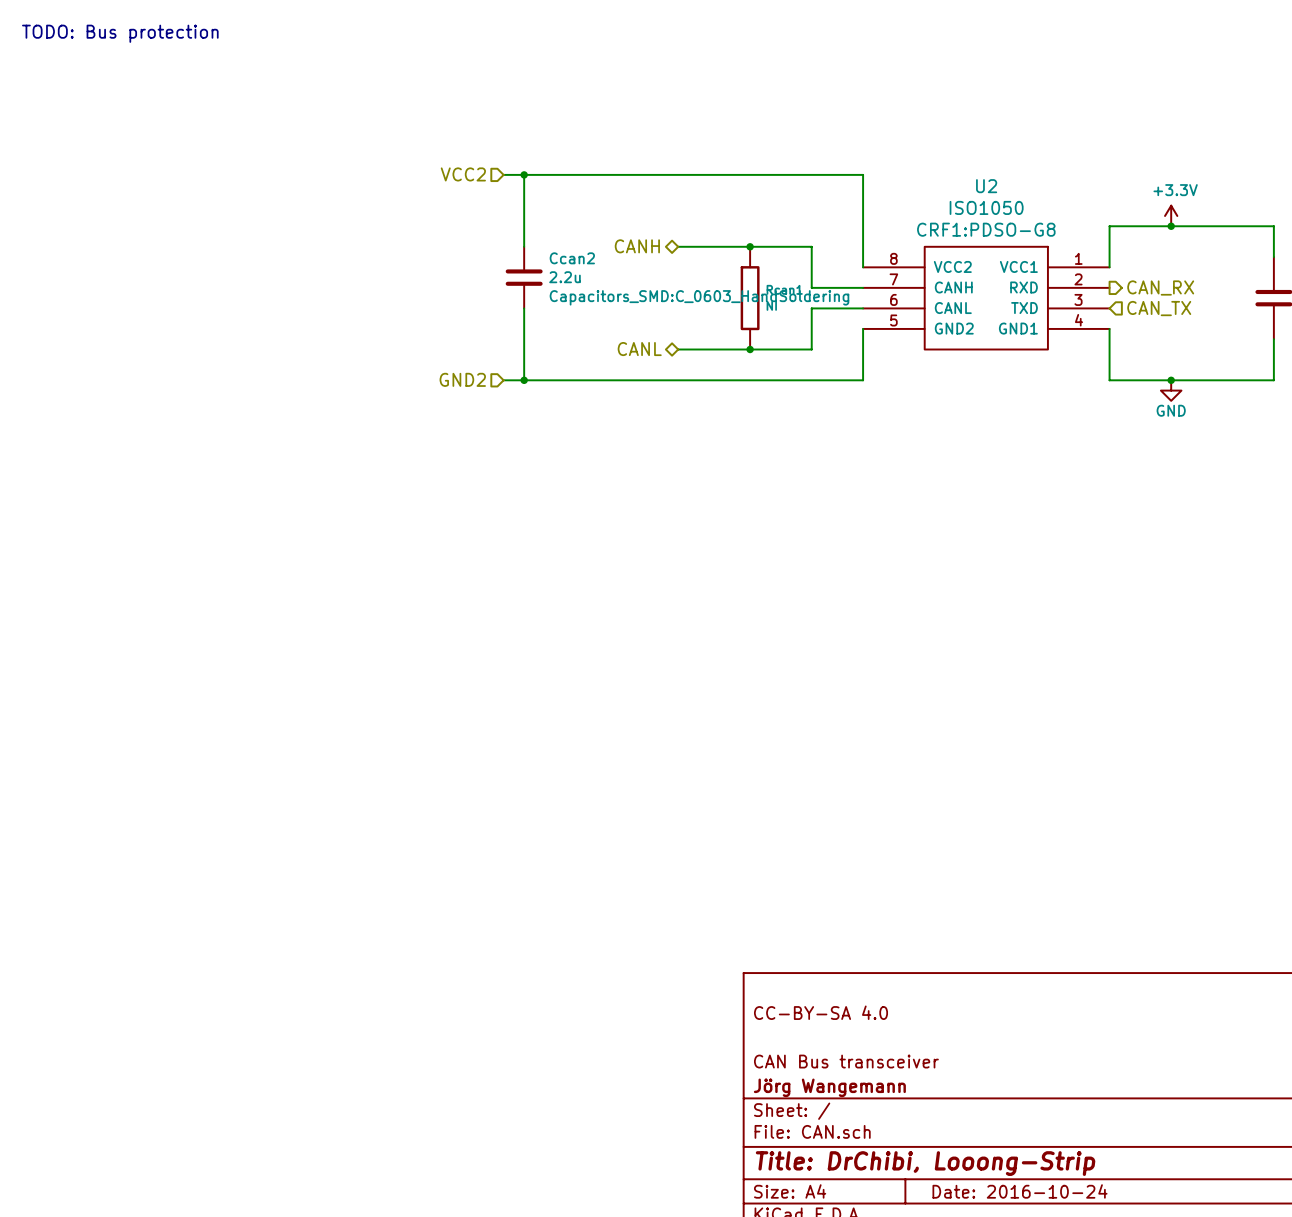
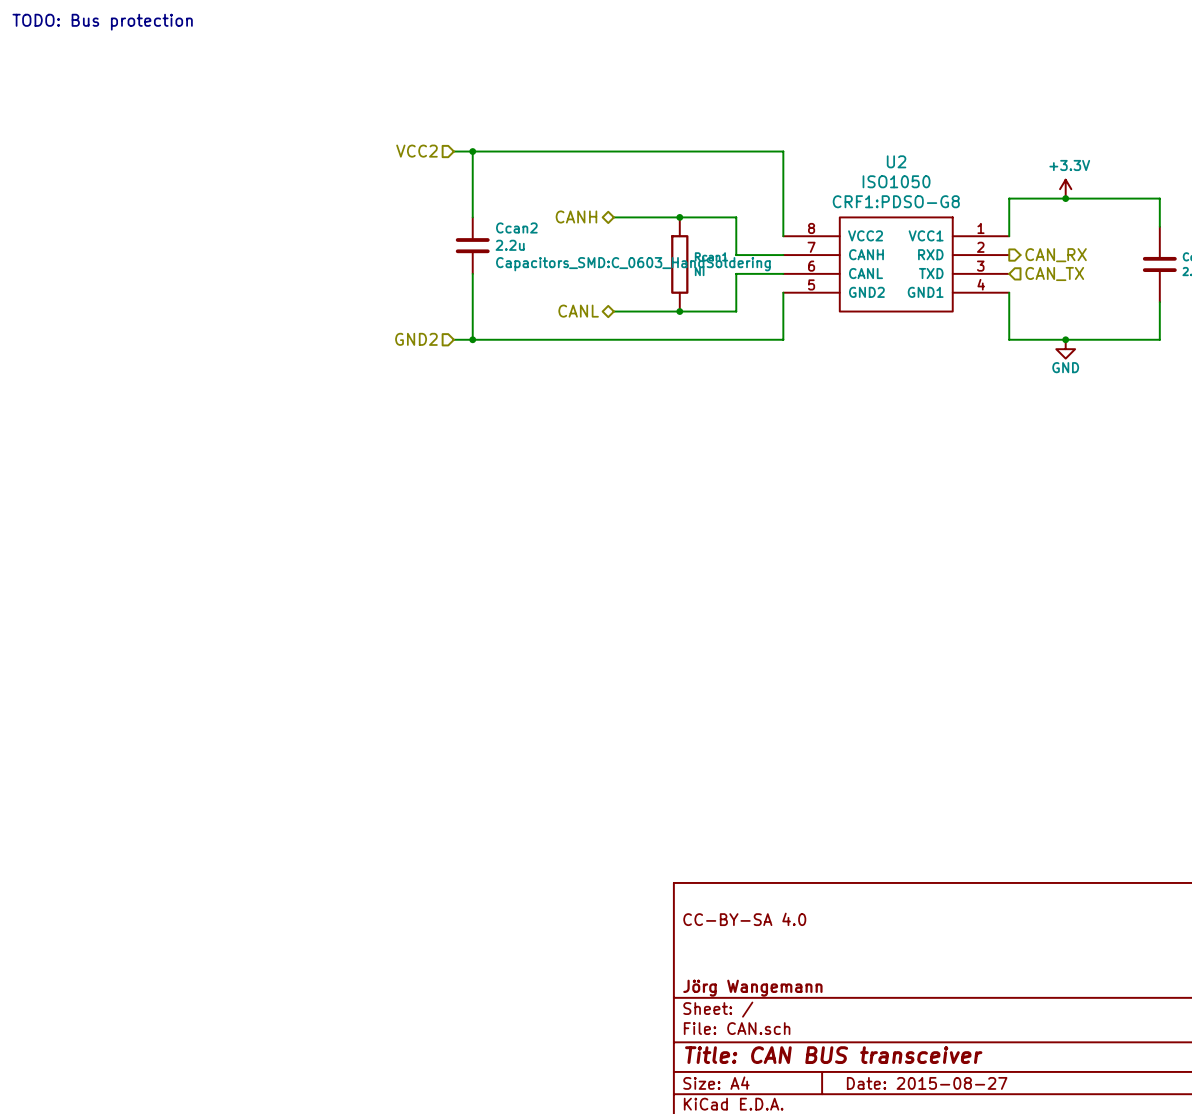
title block: CAN Bus transceiver (846, 1061) -> none
title block: Title: DrChibi, Looong-Strip (925, 1163) -> Title: CAN BUS transceiver (833, 1055)
title block: Date: 2016-10-24 (1020, 1191) -> Date: 2015-08-27 (927, 1083)

